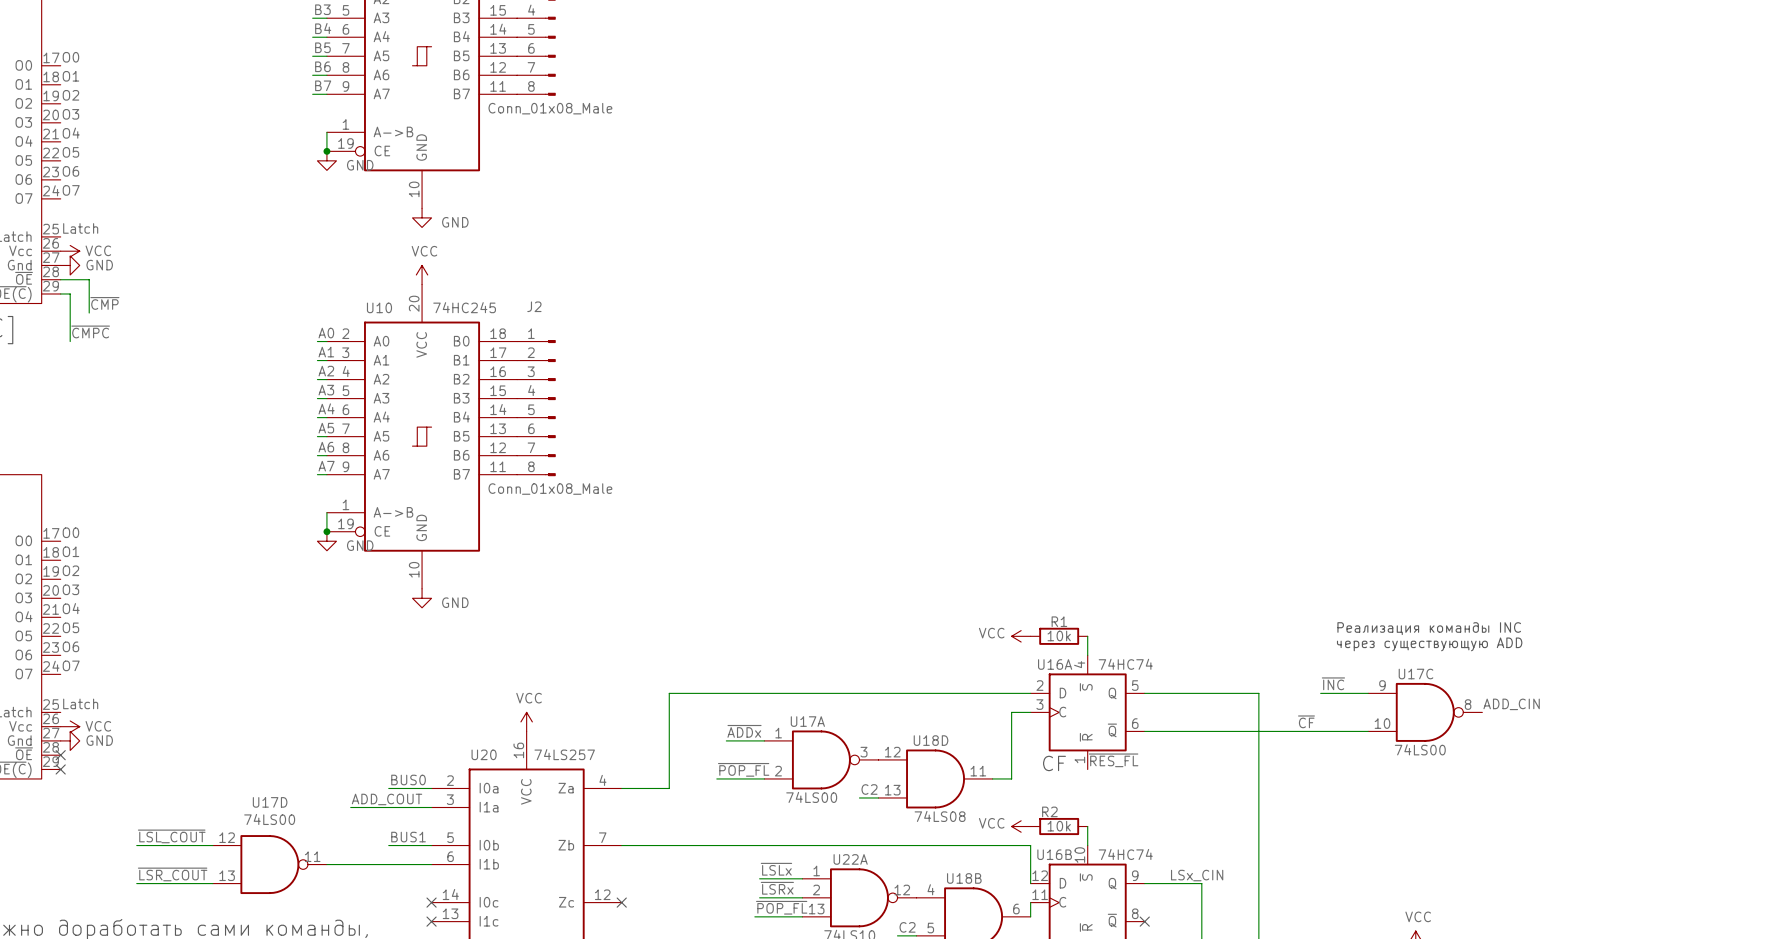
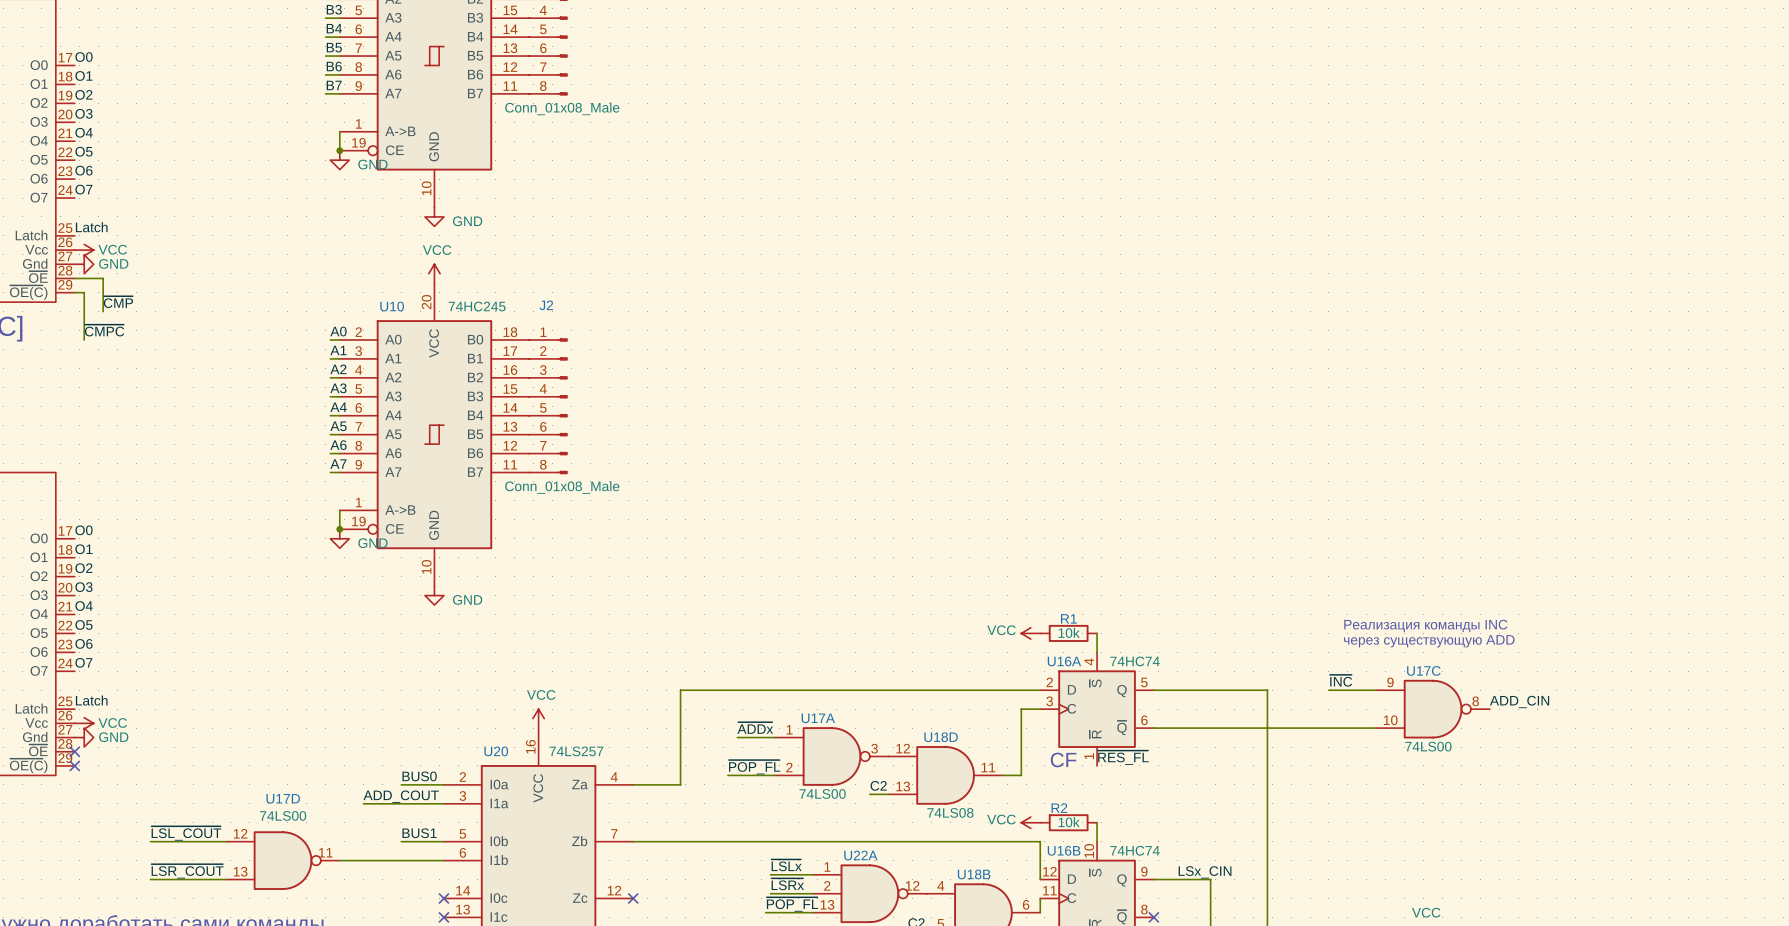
label: ~{CF} (1306, 721) -> none

